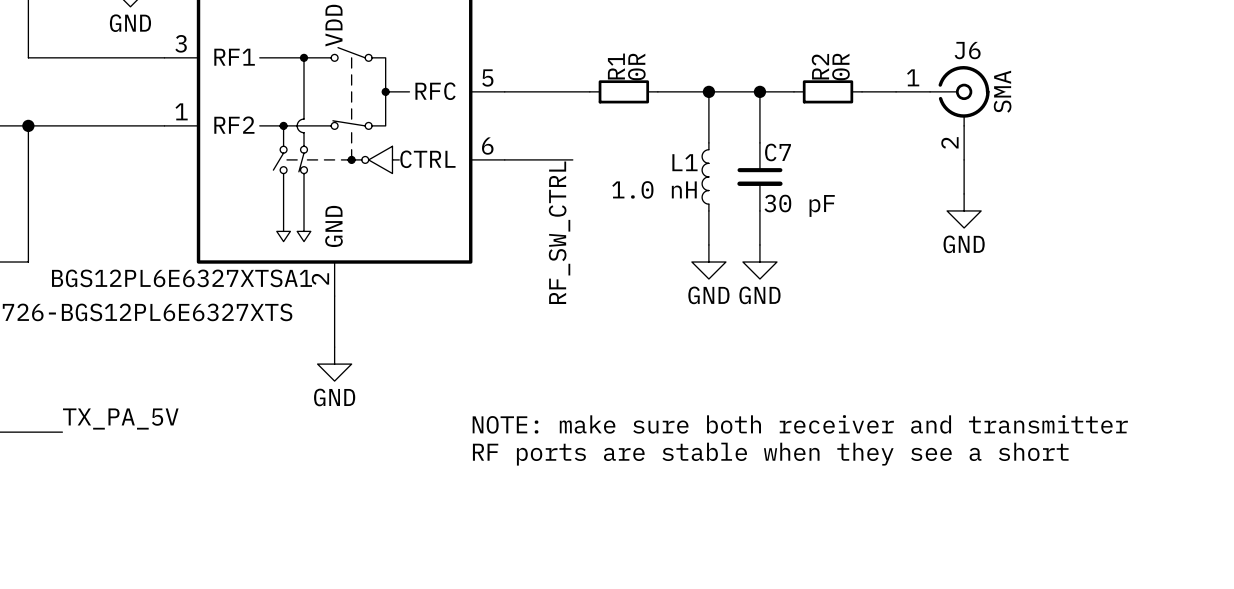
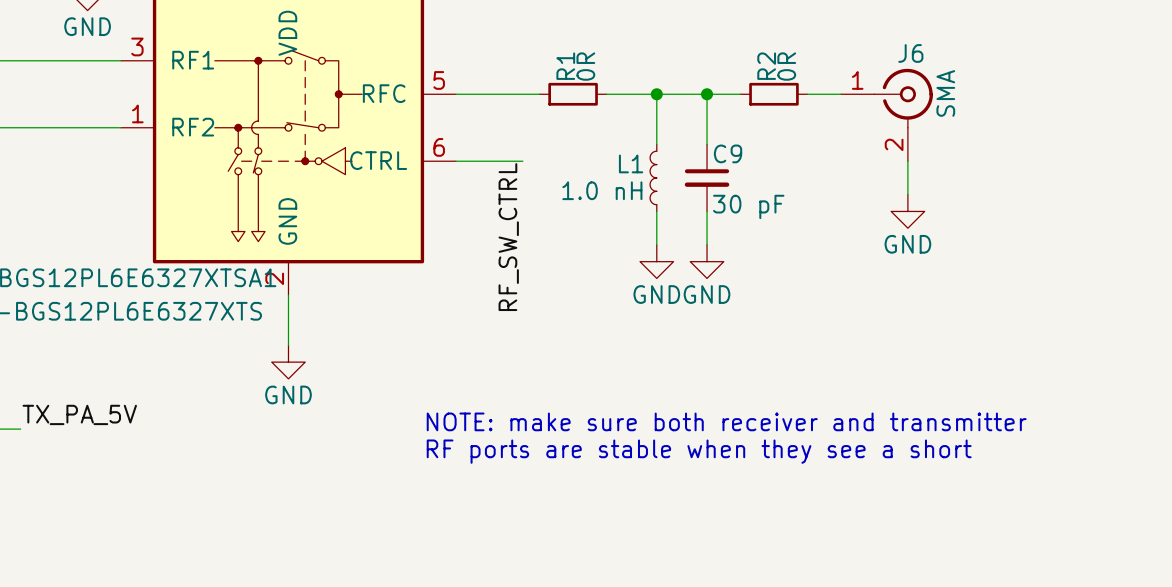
C7 name: C7 (778, 152) -> C9 (728, 153)

